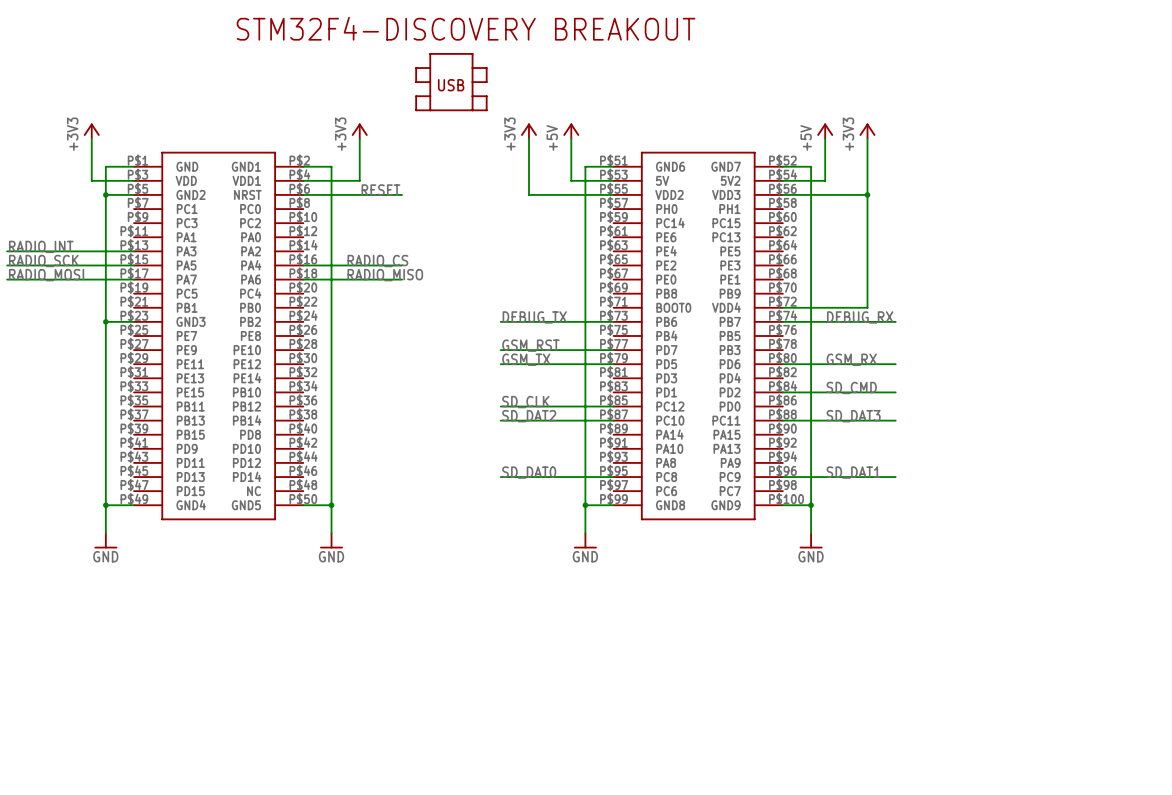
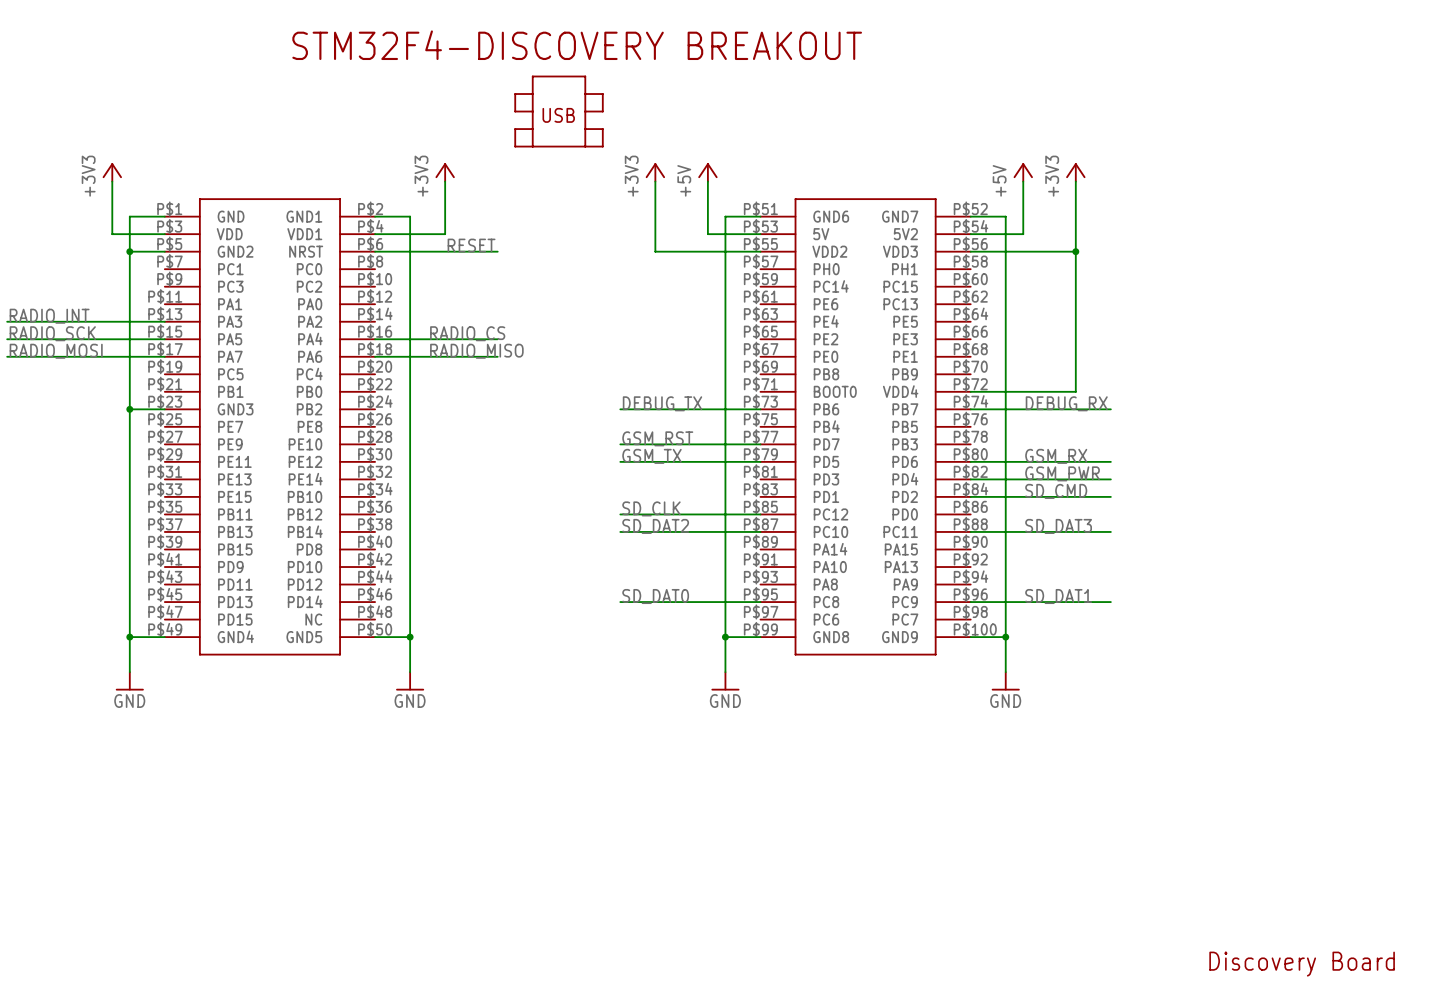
label: none -> GSM_PWR (1062, 473)
wire: none -> (970, 479) (1110, 479)
text: none -> Discovery Board (1302, 964)

